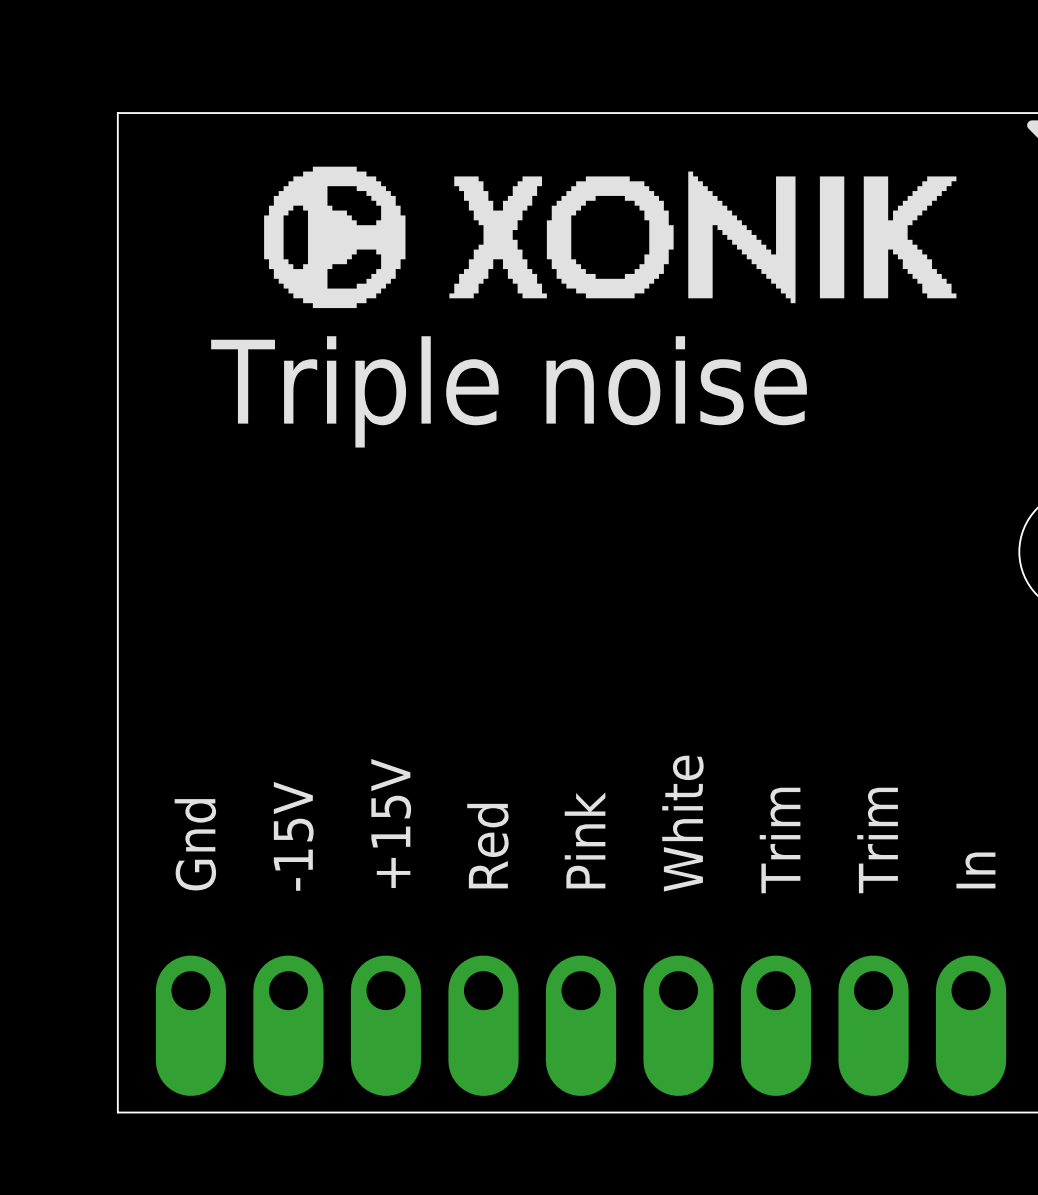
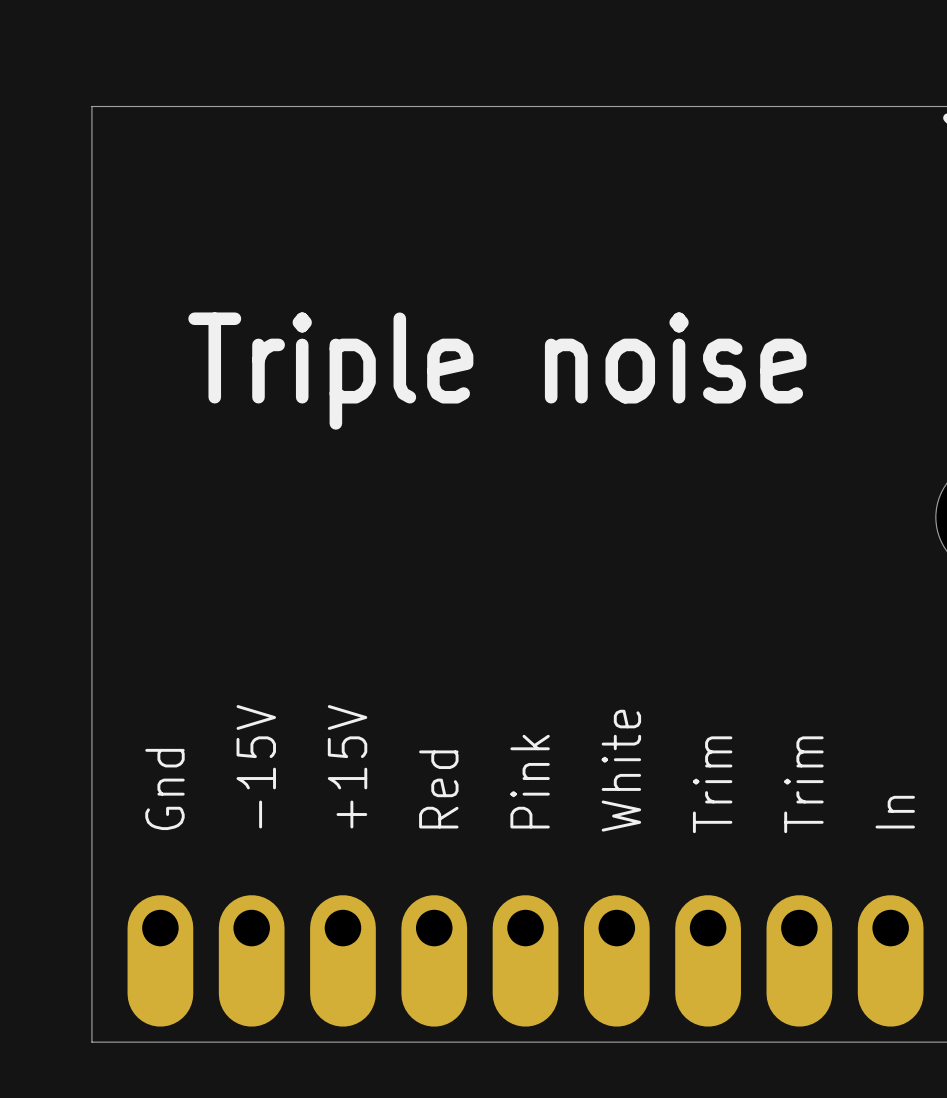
drawing: [264, 166, 406, 309] -> none
drawing: [449, 171, 957, 304] -> none

